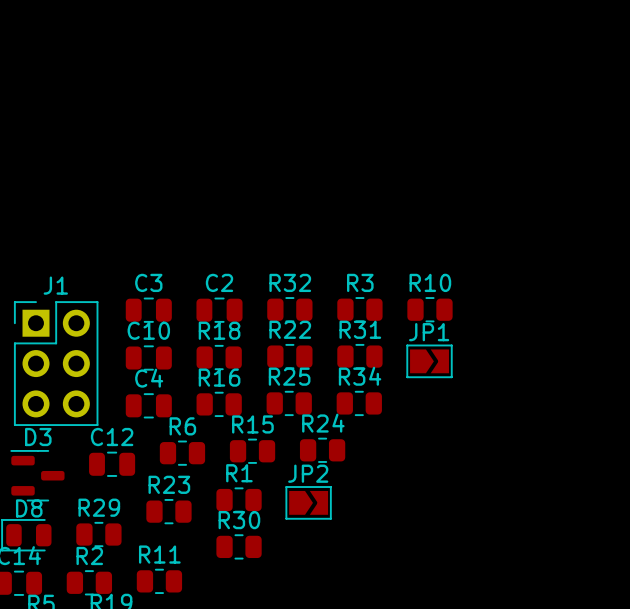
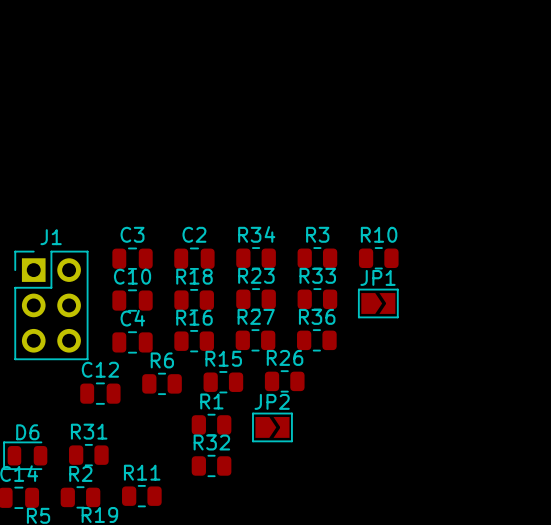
R32 name: R32 (290, 282) -> R34 (256, 234)
R22 name: R22 (290, 329) -> R23 (256, 275)
R31 name: R31 (360, 329) -> R33 (317, 275)
R25 name: R25 (289, 376) -> R27 (256, 316)
R34 name: R34 (360, 376) -> R36 (317, 316)
R24 name: R24 (323, 423) -> R26 (285, 357)
D3: (37, 475) -> none
R29 name: R29 (99, 507) -> R31 (89, 431)
D8 name: D8 (29, 508) -> D6 (27, 432)
R23: (168, 511) -> none
R30 name: R30 (239, 520) -> R32 (211, 442)

